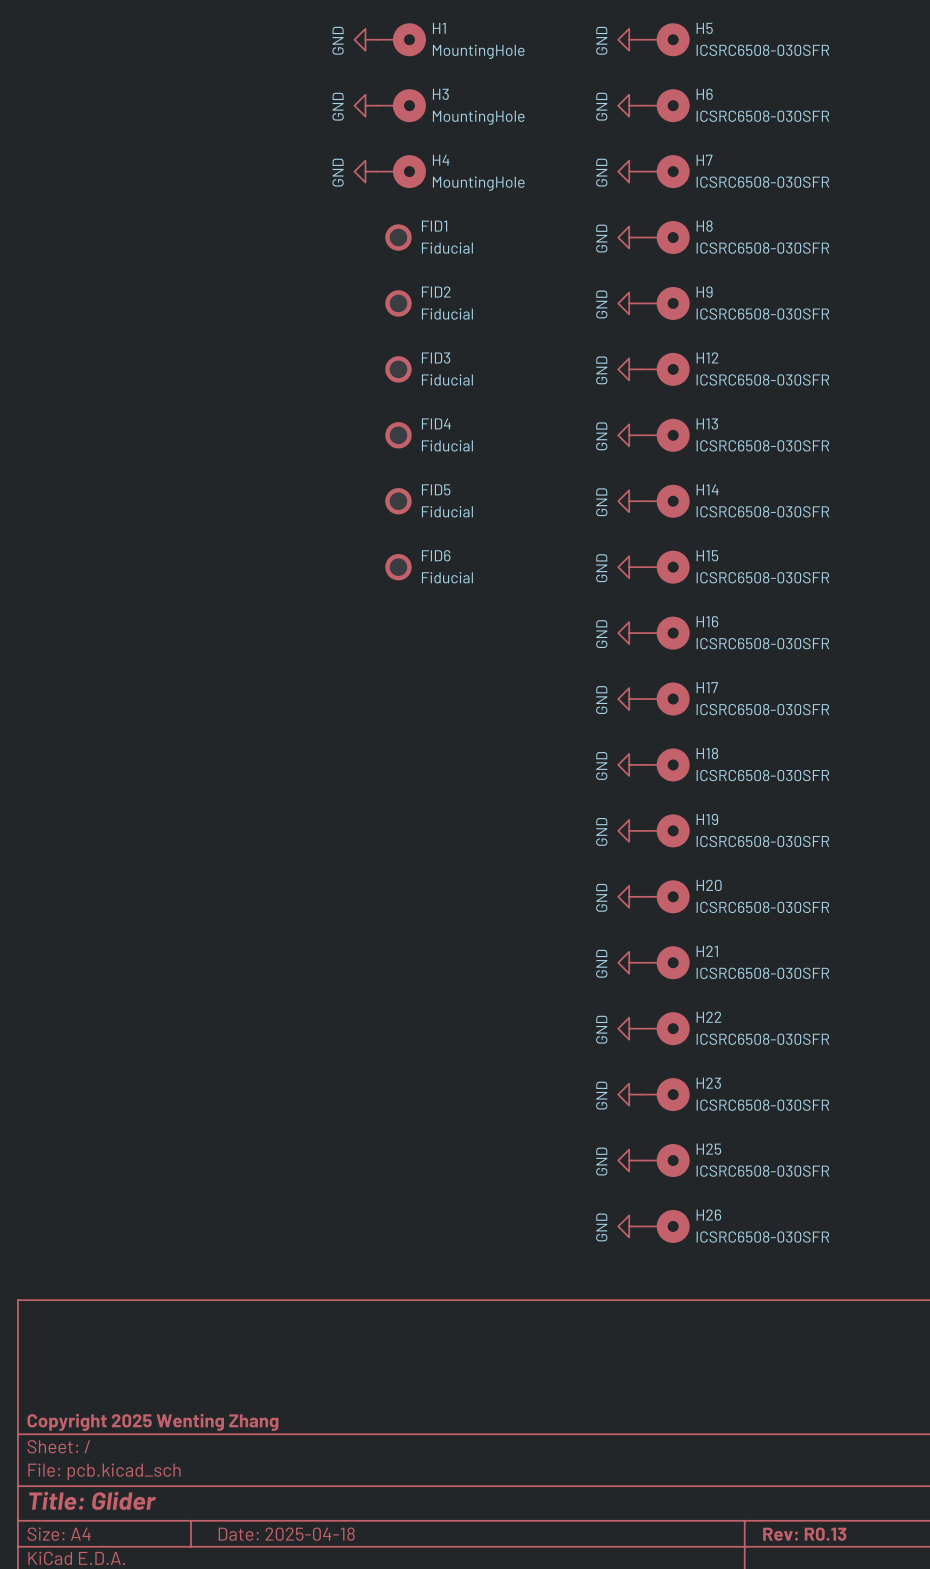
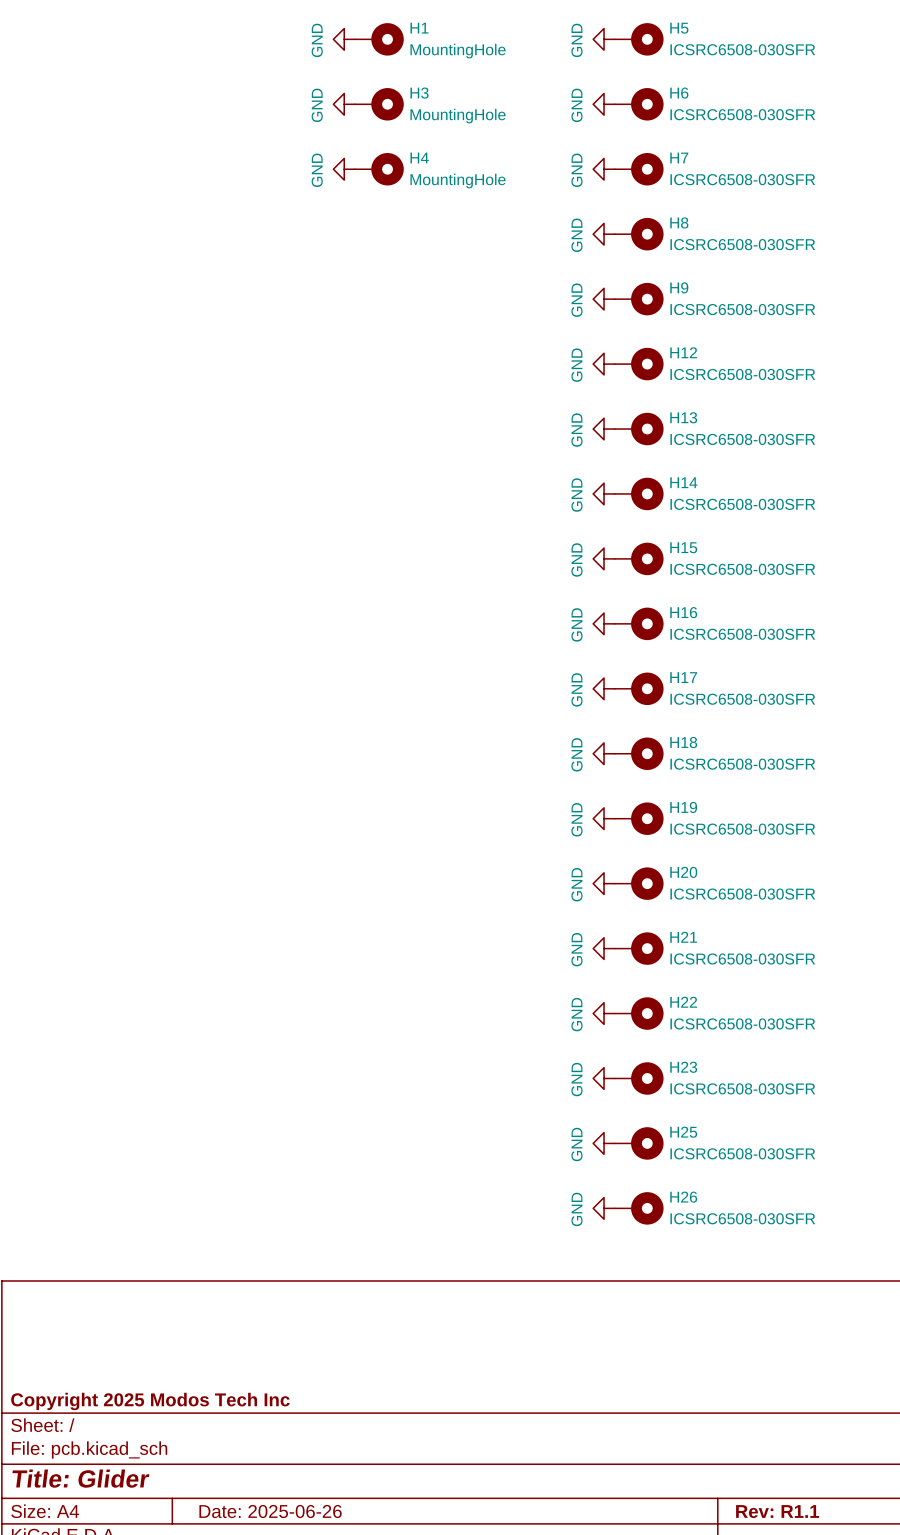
FID1: Fiducial (398, 237) -> none
FID2: Fiducial (398, 303) -> none
FID3: Fiducial (398, 369) -> none
FID4: Fiducial (398, 435) -> none
FID5: Fiducial (398, 501) -> none
FID6: Fiducial (398, 567) -> none
title block: Copyright 2025 Wenting Zhang (152, 1422) -> Copyright 2025 Modos Tech Inc (150, 1401)
title block: Date: 2025-04-18 (286, 1534) -> Date: 2025-06-26 (270, 1511)
title block: Rev: R0.13 (804, 1534) -> Rev: R1.1 (777, 1511)

